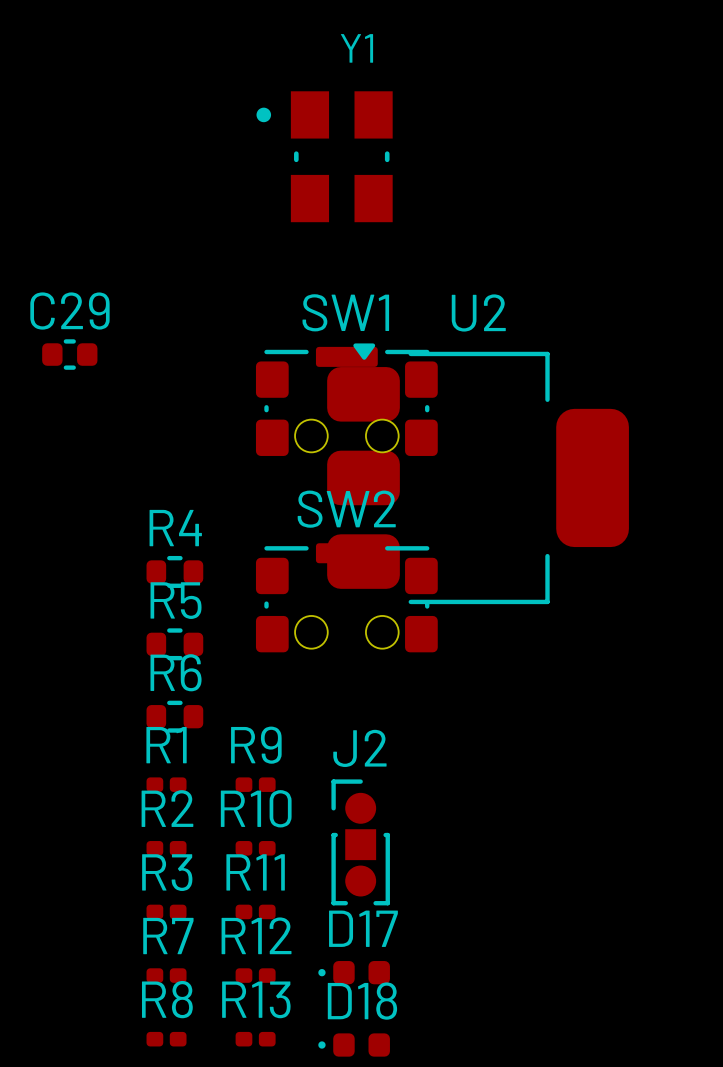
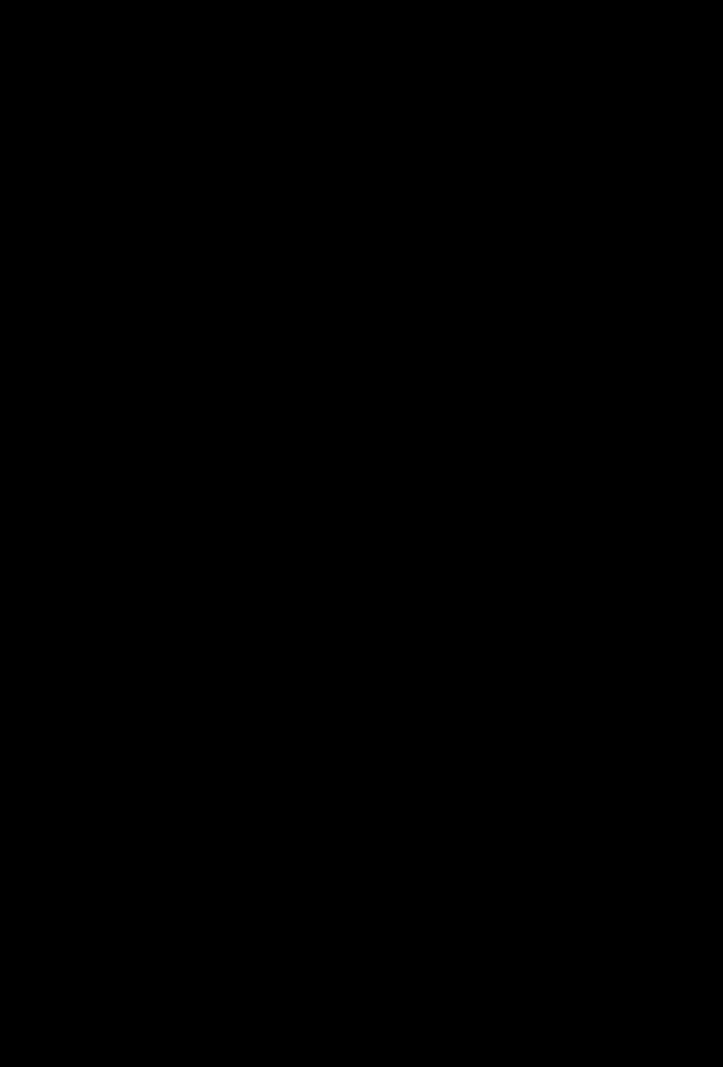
Y1: (324, 156) -> none
C29: (69, 354) -> none
SW1: (346, 401) -> none
U2: (478, 473) -> none
R4: (174, 571) -> none
SW2: (346, 597) -> none
R5: (174, 644) -> none
R6: (174, 716) -> none
R1: (166, 784) -> none
R9: (255, 784) -> none
J2: (360, 842) -> none
R2: (166, 848) -> none
R10: (255, 848) -> none
R3: (166, 911) -> none
R11: (255, 911) -> none
D17: (354, 972) -> none
R7: (166, 975) -> none
R12: (255, 975) -> none
R8: (166, 1039) -> none
R13: (255, 1039) -> none
D18: (354, 1045) -> none

